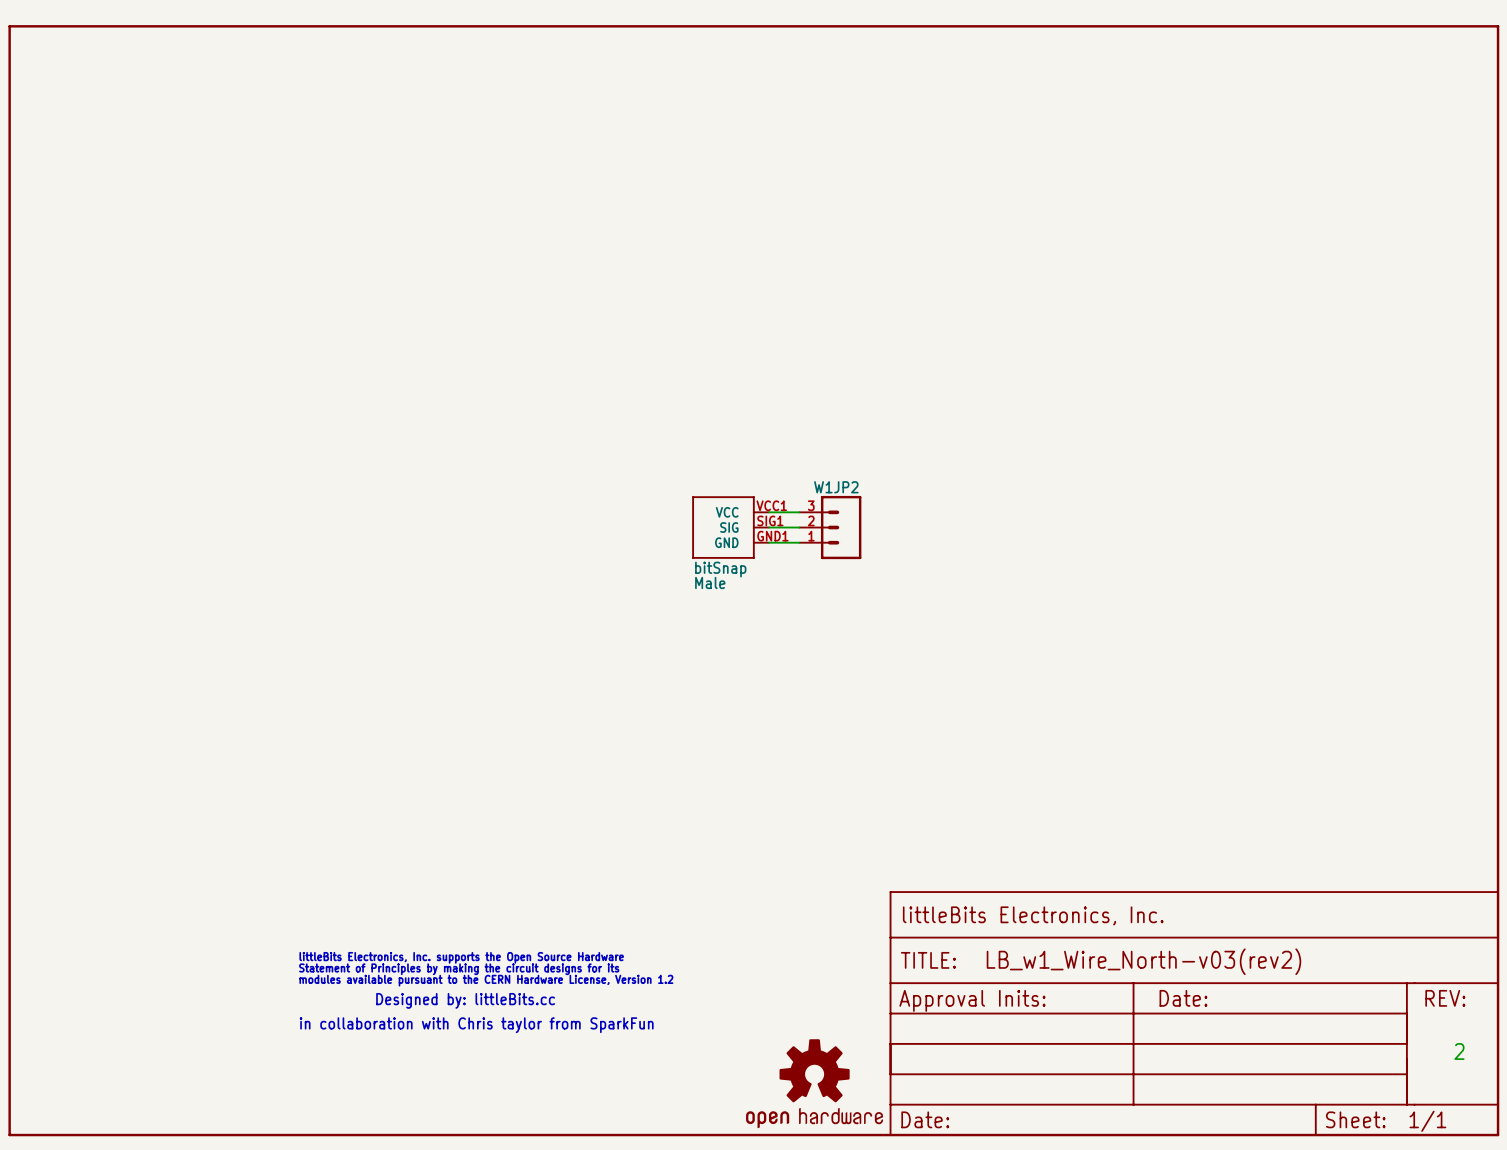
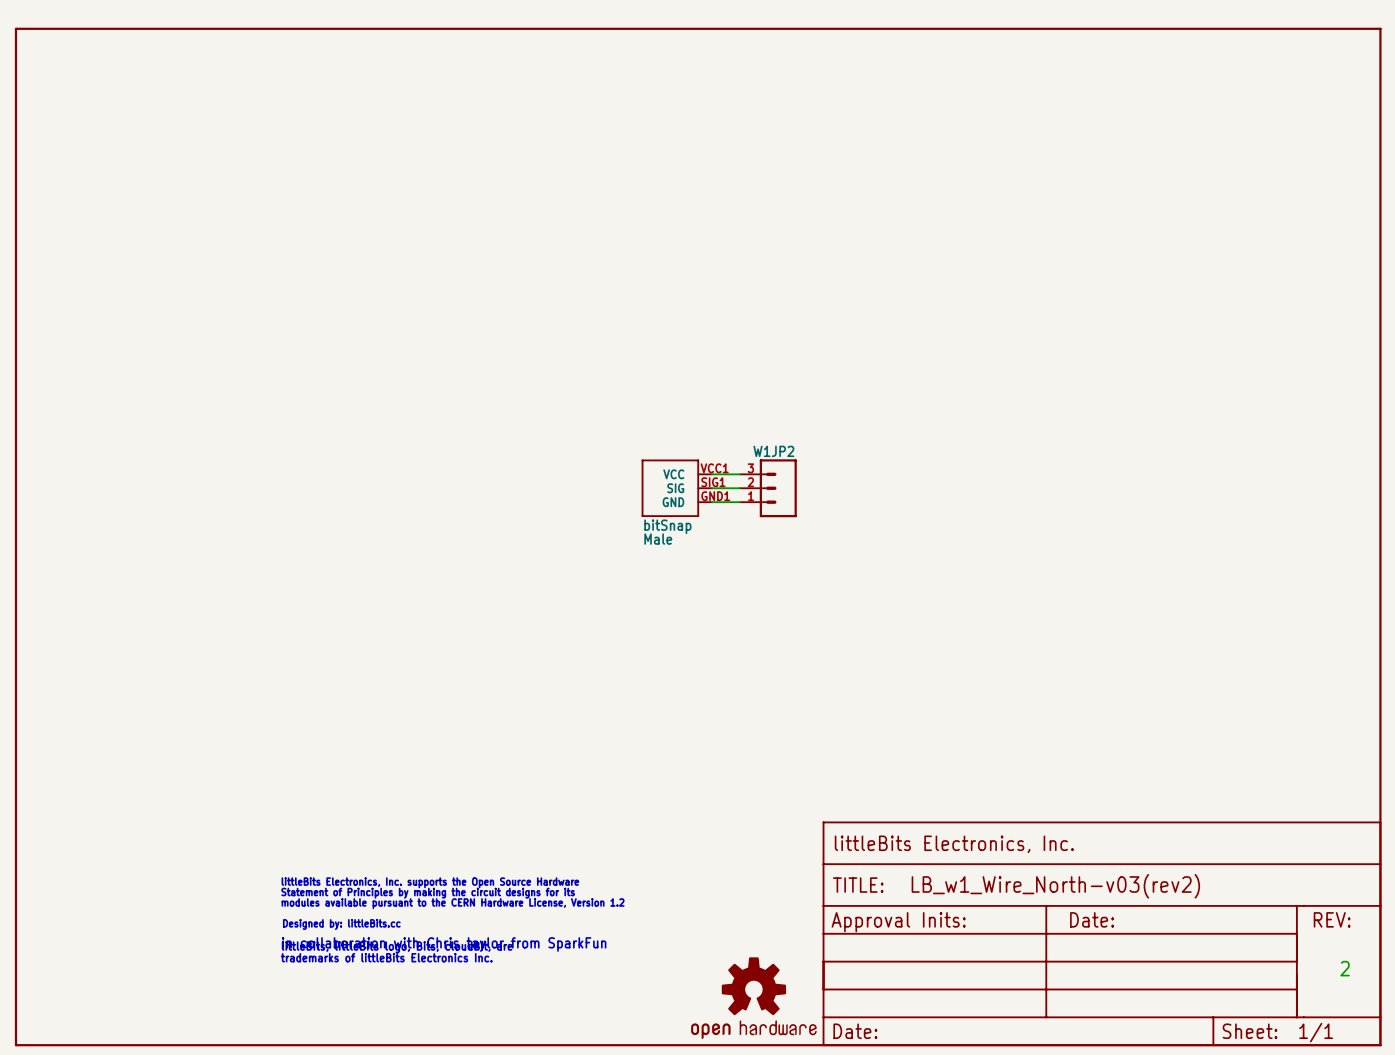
part: (486, 980) -> none
part: none -> (452, 919)

